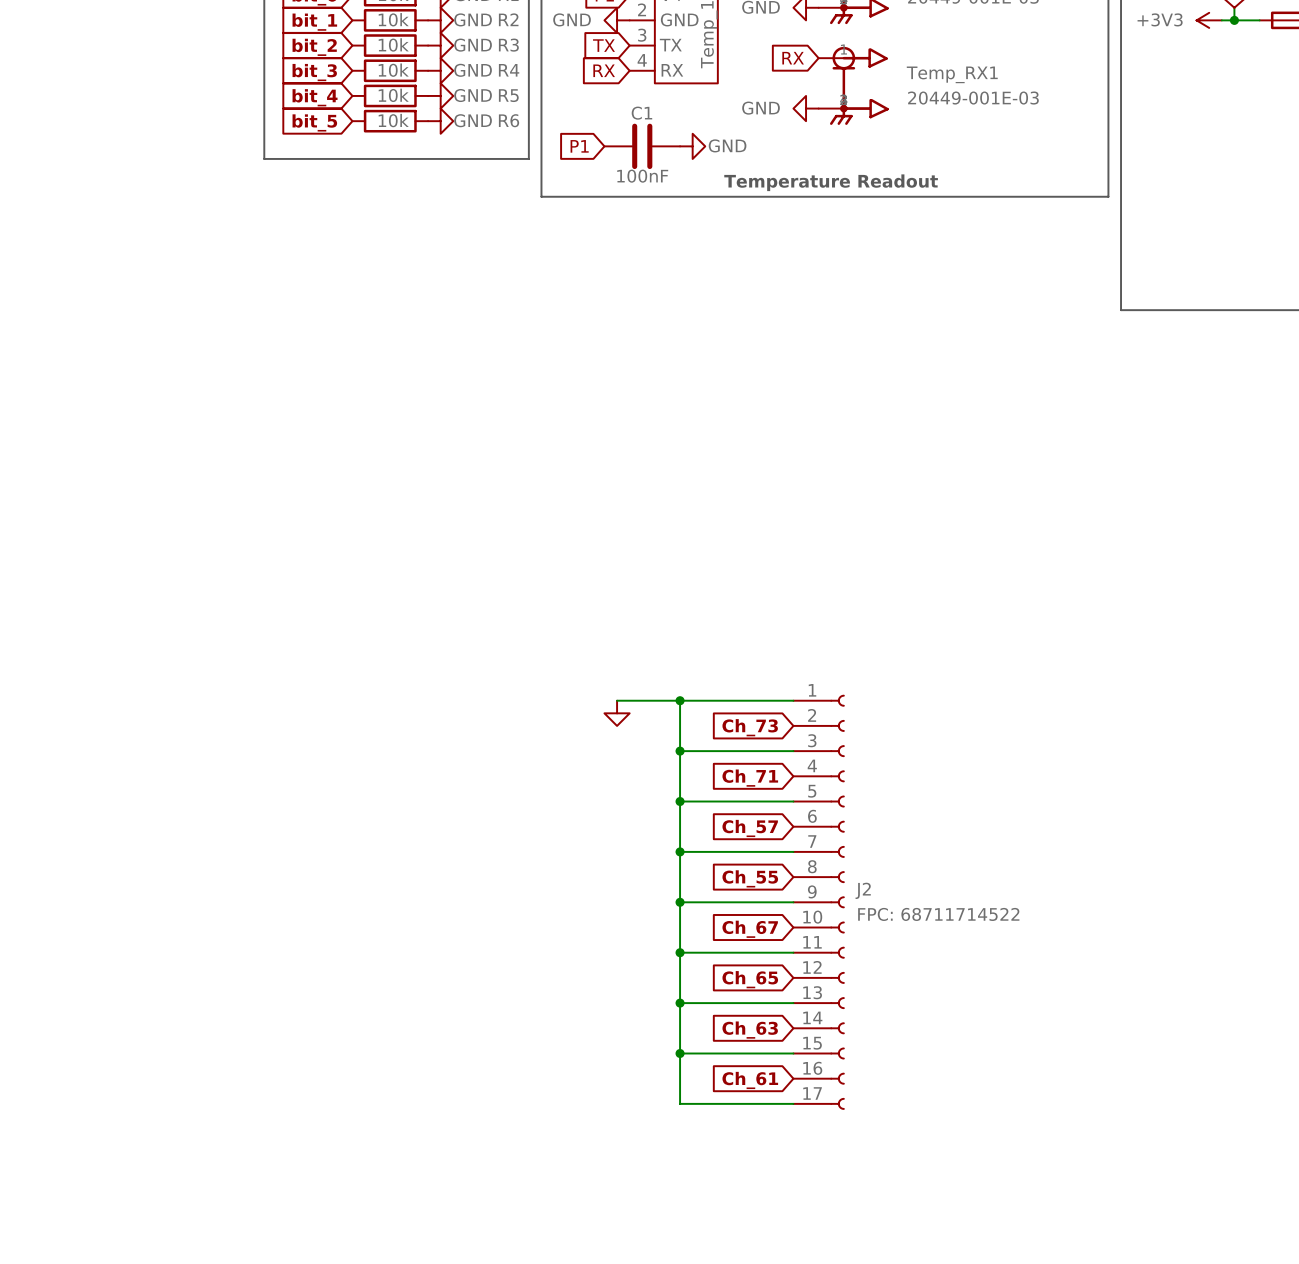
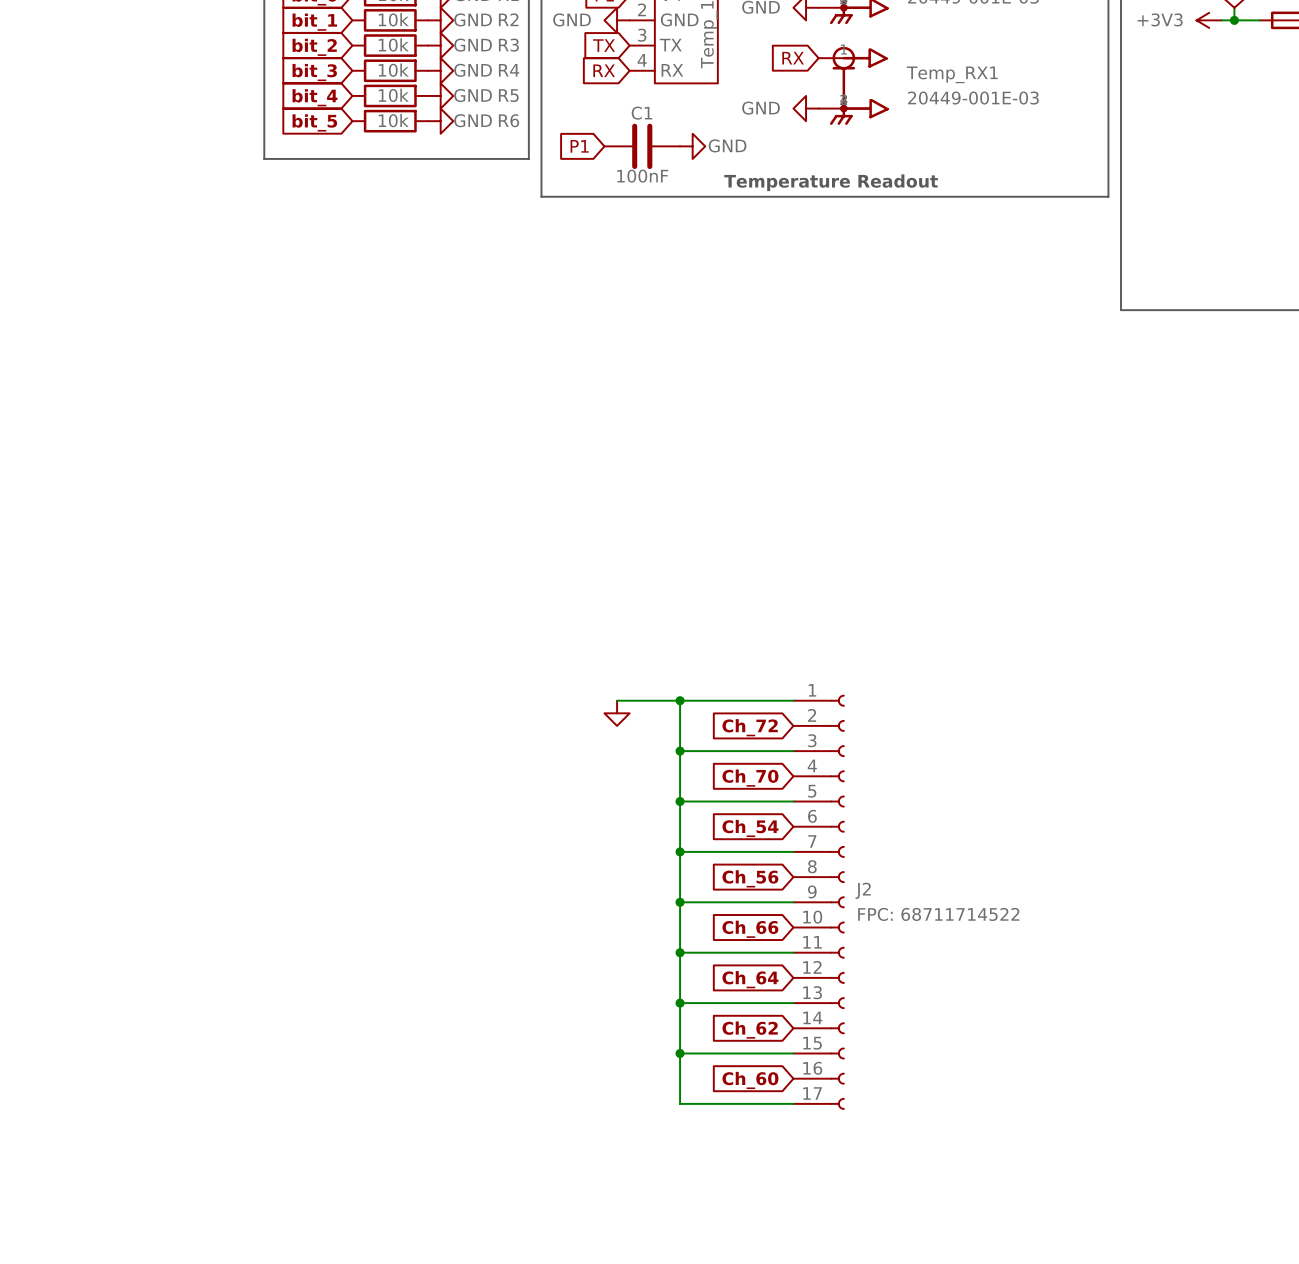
global label: Ch_73 (750, 727) -> Ch_72 (750, 727)
global label: Ch_71 (750, 778) -> Ch_70 (750, 778)
global label: Ch_57 (750, 828) -> Ch_54 (750, 828)
global label: Ch_55 (750, 878) -> Ch_56 (750, 878)
global label: Ch_67 (750, 929) -> Ch_66 (750, 929)
global label: Ch_65 (750, 979) -> Ch_64 (750, 979)
global label: Ch_63 (750, 1030) -> Ch_62 (750, 1030)
global label: Ch_61 (750, 1080) -> Ch_60 (750, 1080)

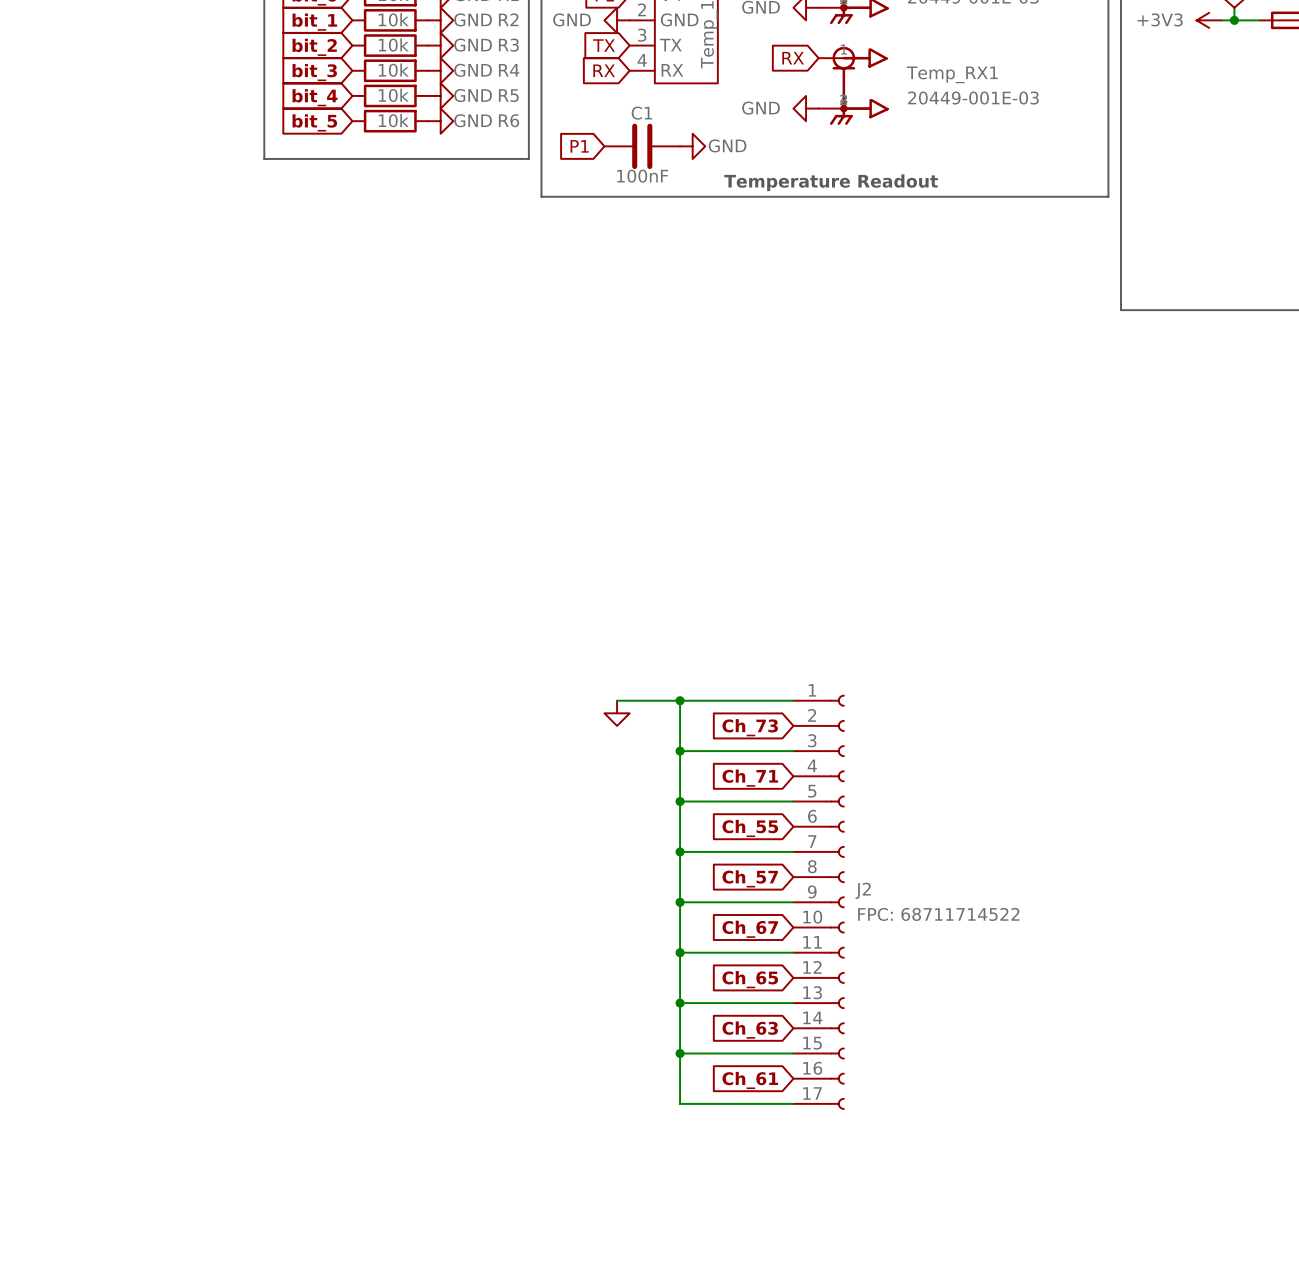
global label: Ch_72 (750, 727) -> Ch_73 (750, 727)
global label: Ch_70 (750, 778) -> Ch_71 (750, 778)
global label: Ch_54 (750, 828) -> Ch_55 (750, 828)
global label: Ch_56 (750, 878) -> Ch_57 (750, 878)
global label: Ch_66 (750, 929) -> Ch_67 (750, 929)
global label: Ch_64 (750, 979) -> Ch_65 (750, 979)
global label: Ch_62 (750, 1030) -> Ch_63 (750, 1030)
global label: Ch_60 (750, 1080) -> Ch_61 (750, 1080)

